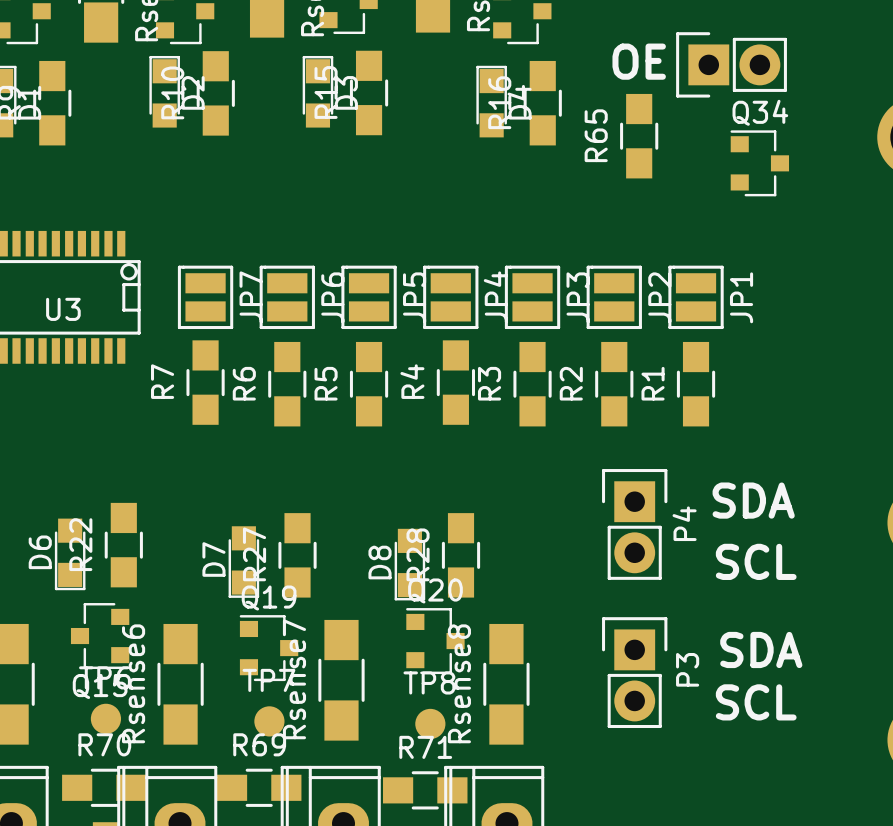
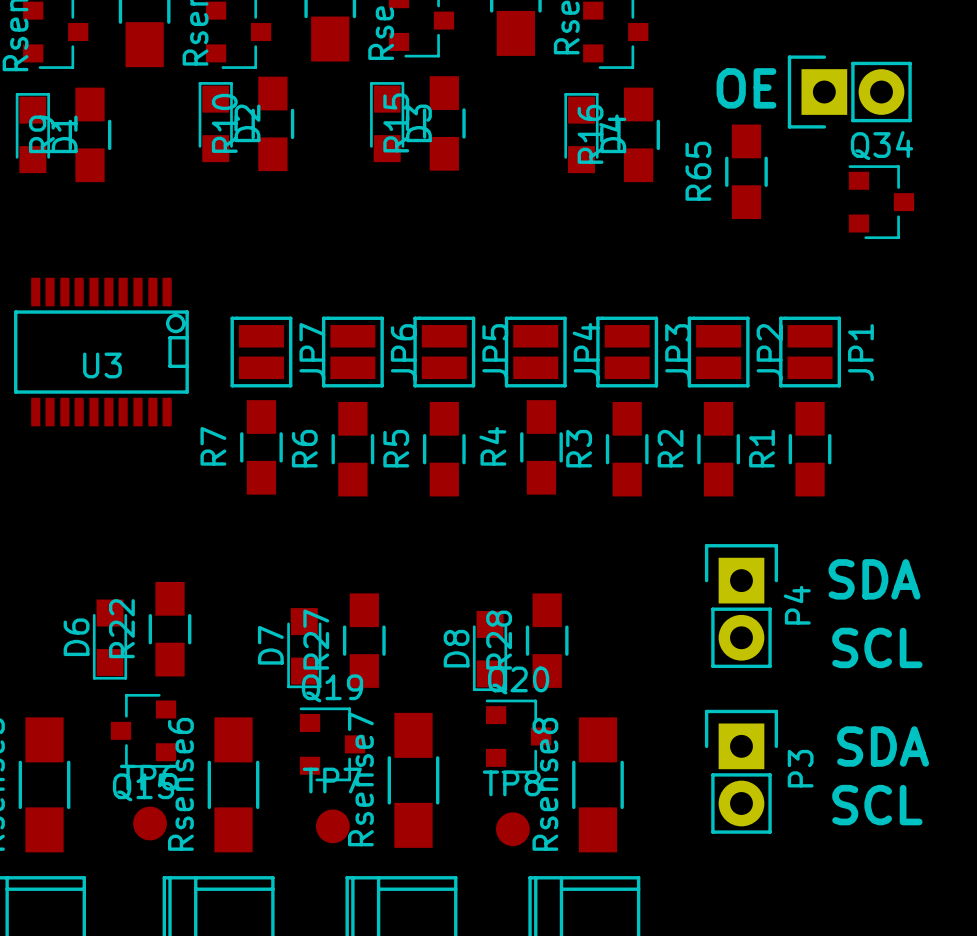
R70: (104, 787) -> none
R69: (259, 787) -> none
R71: (425, 790) -> none

